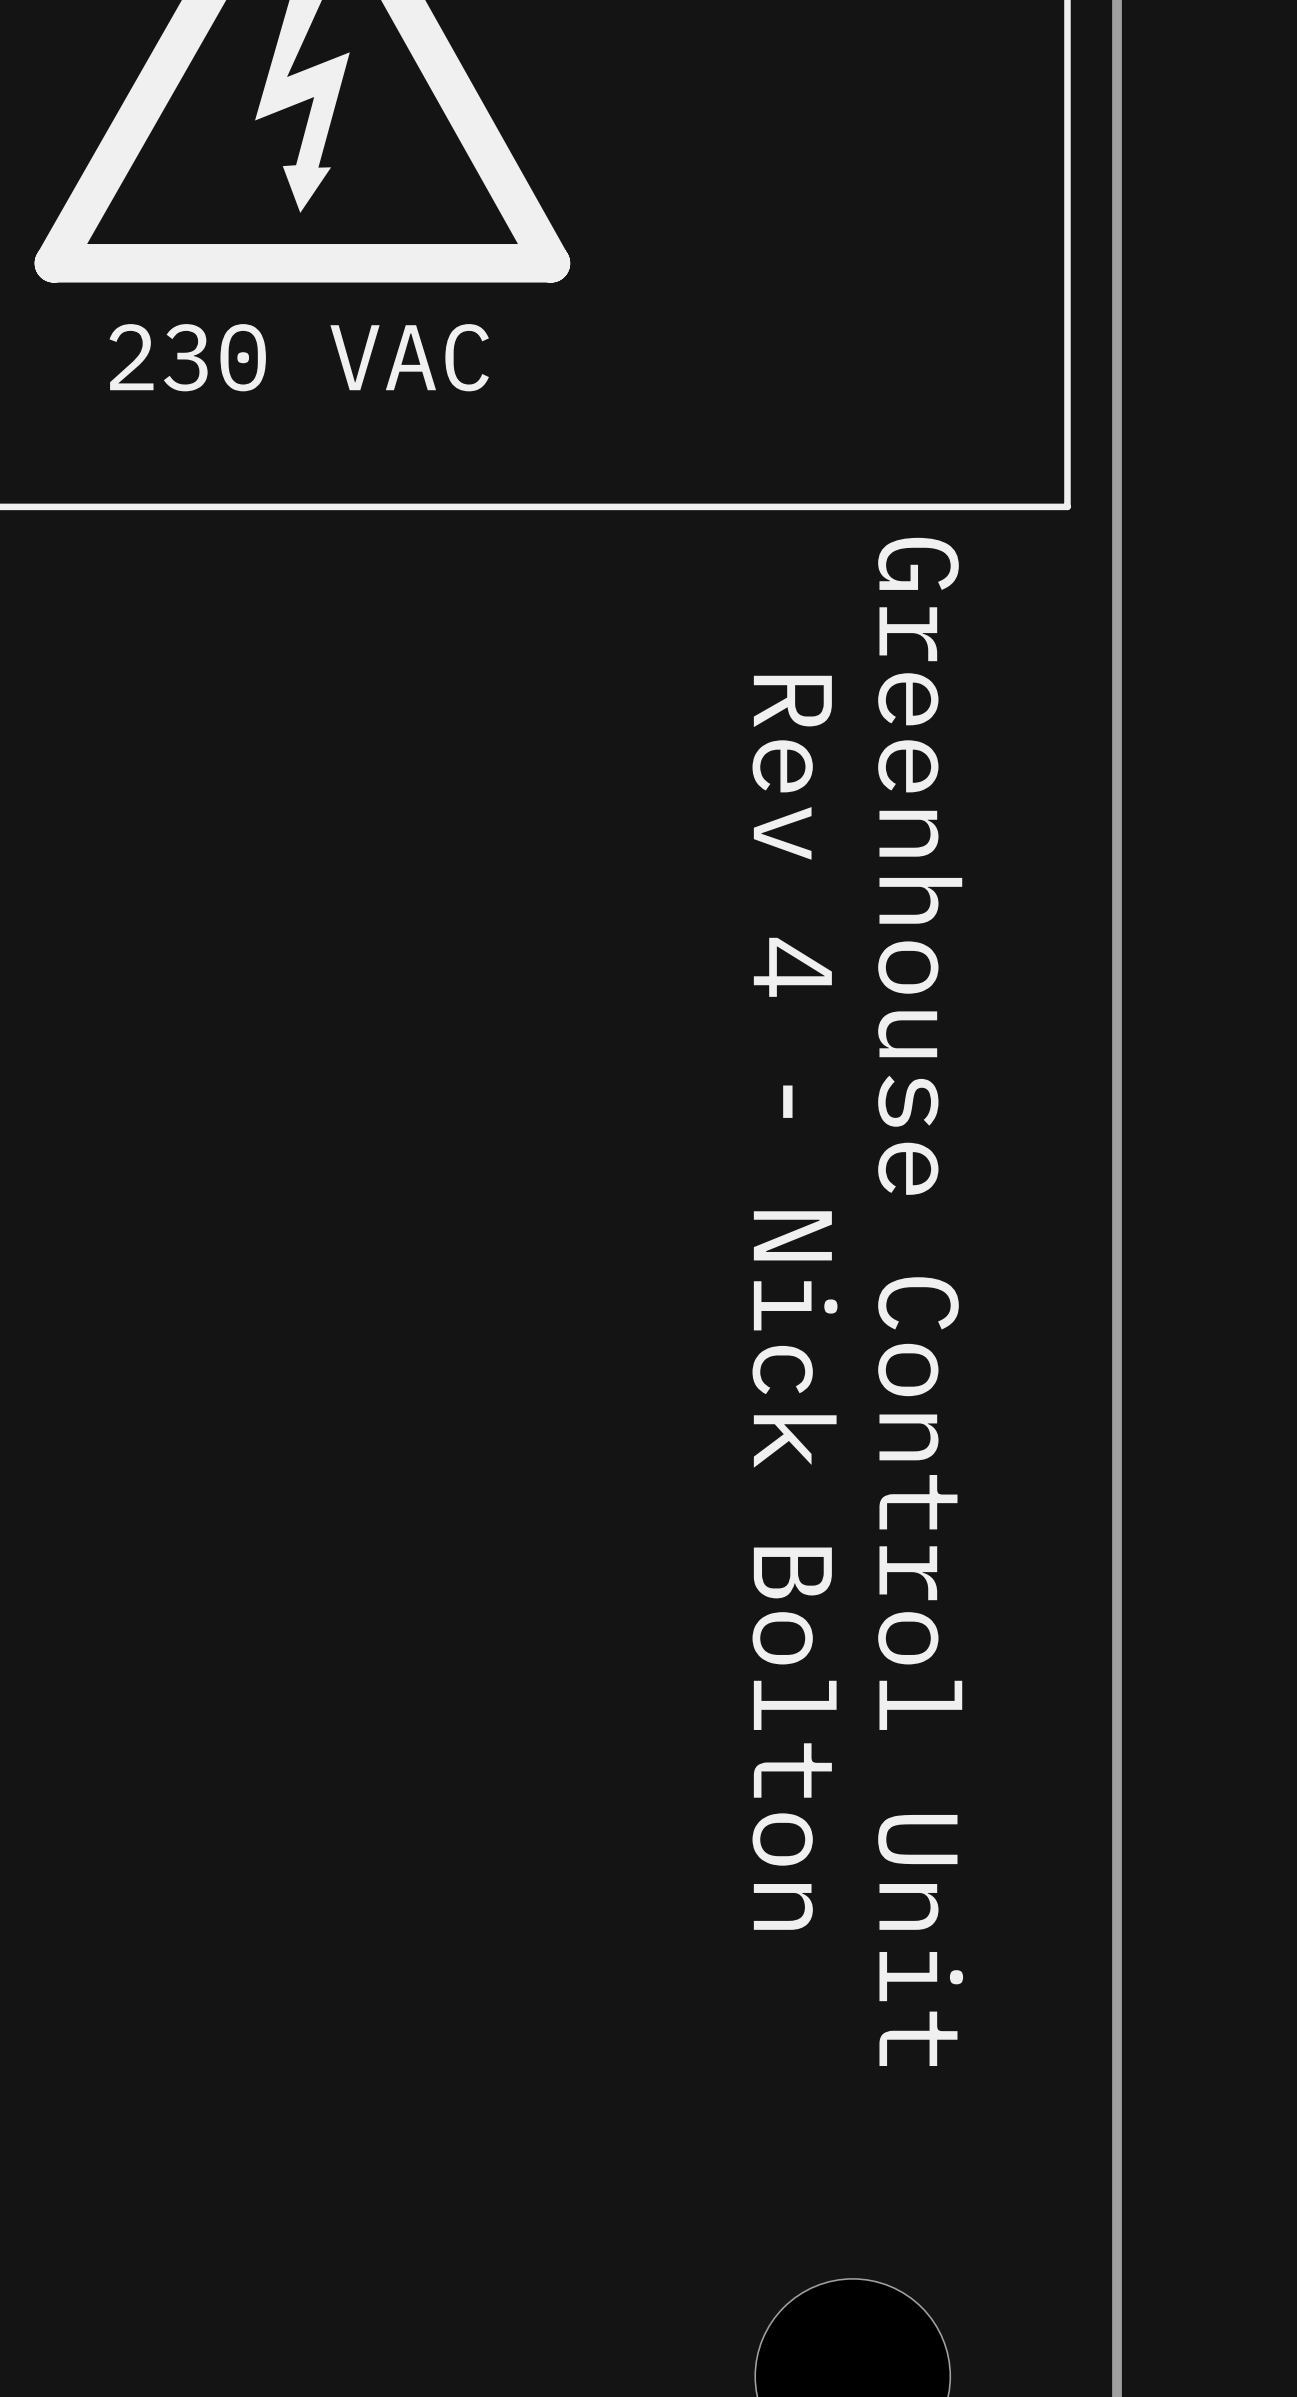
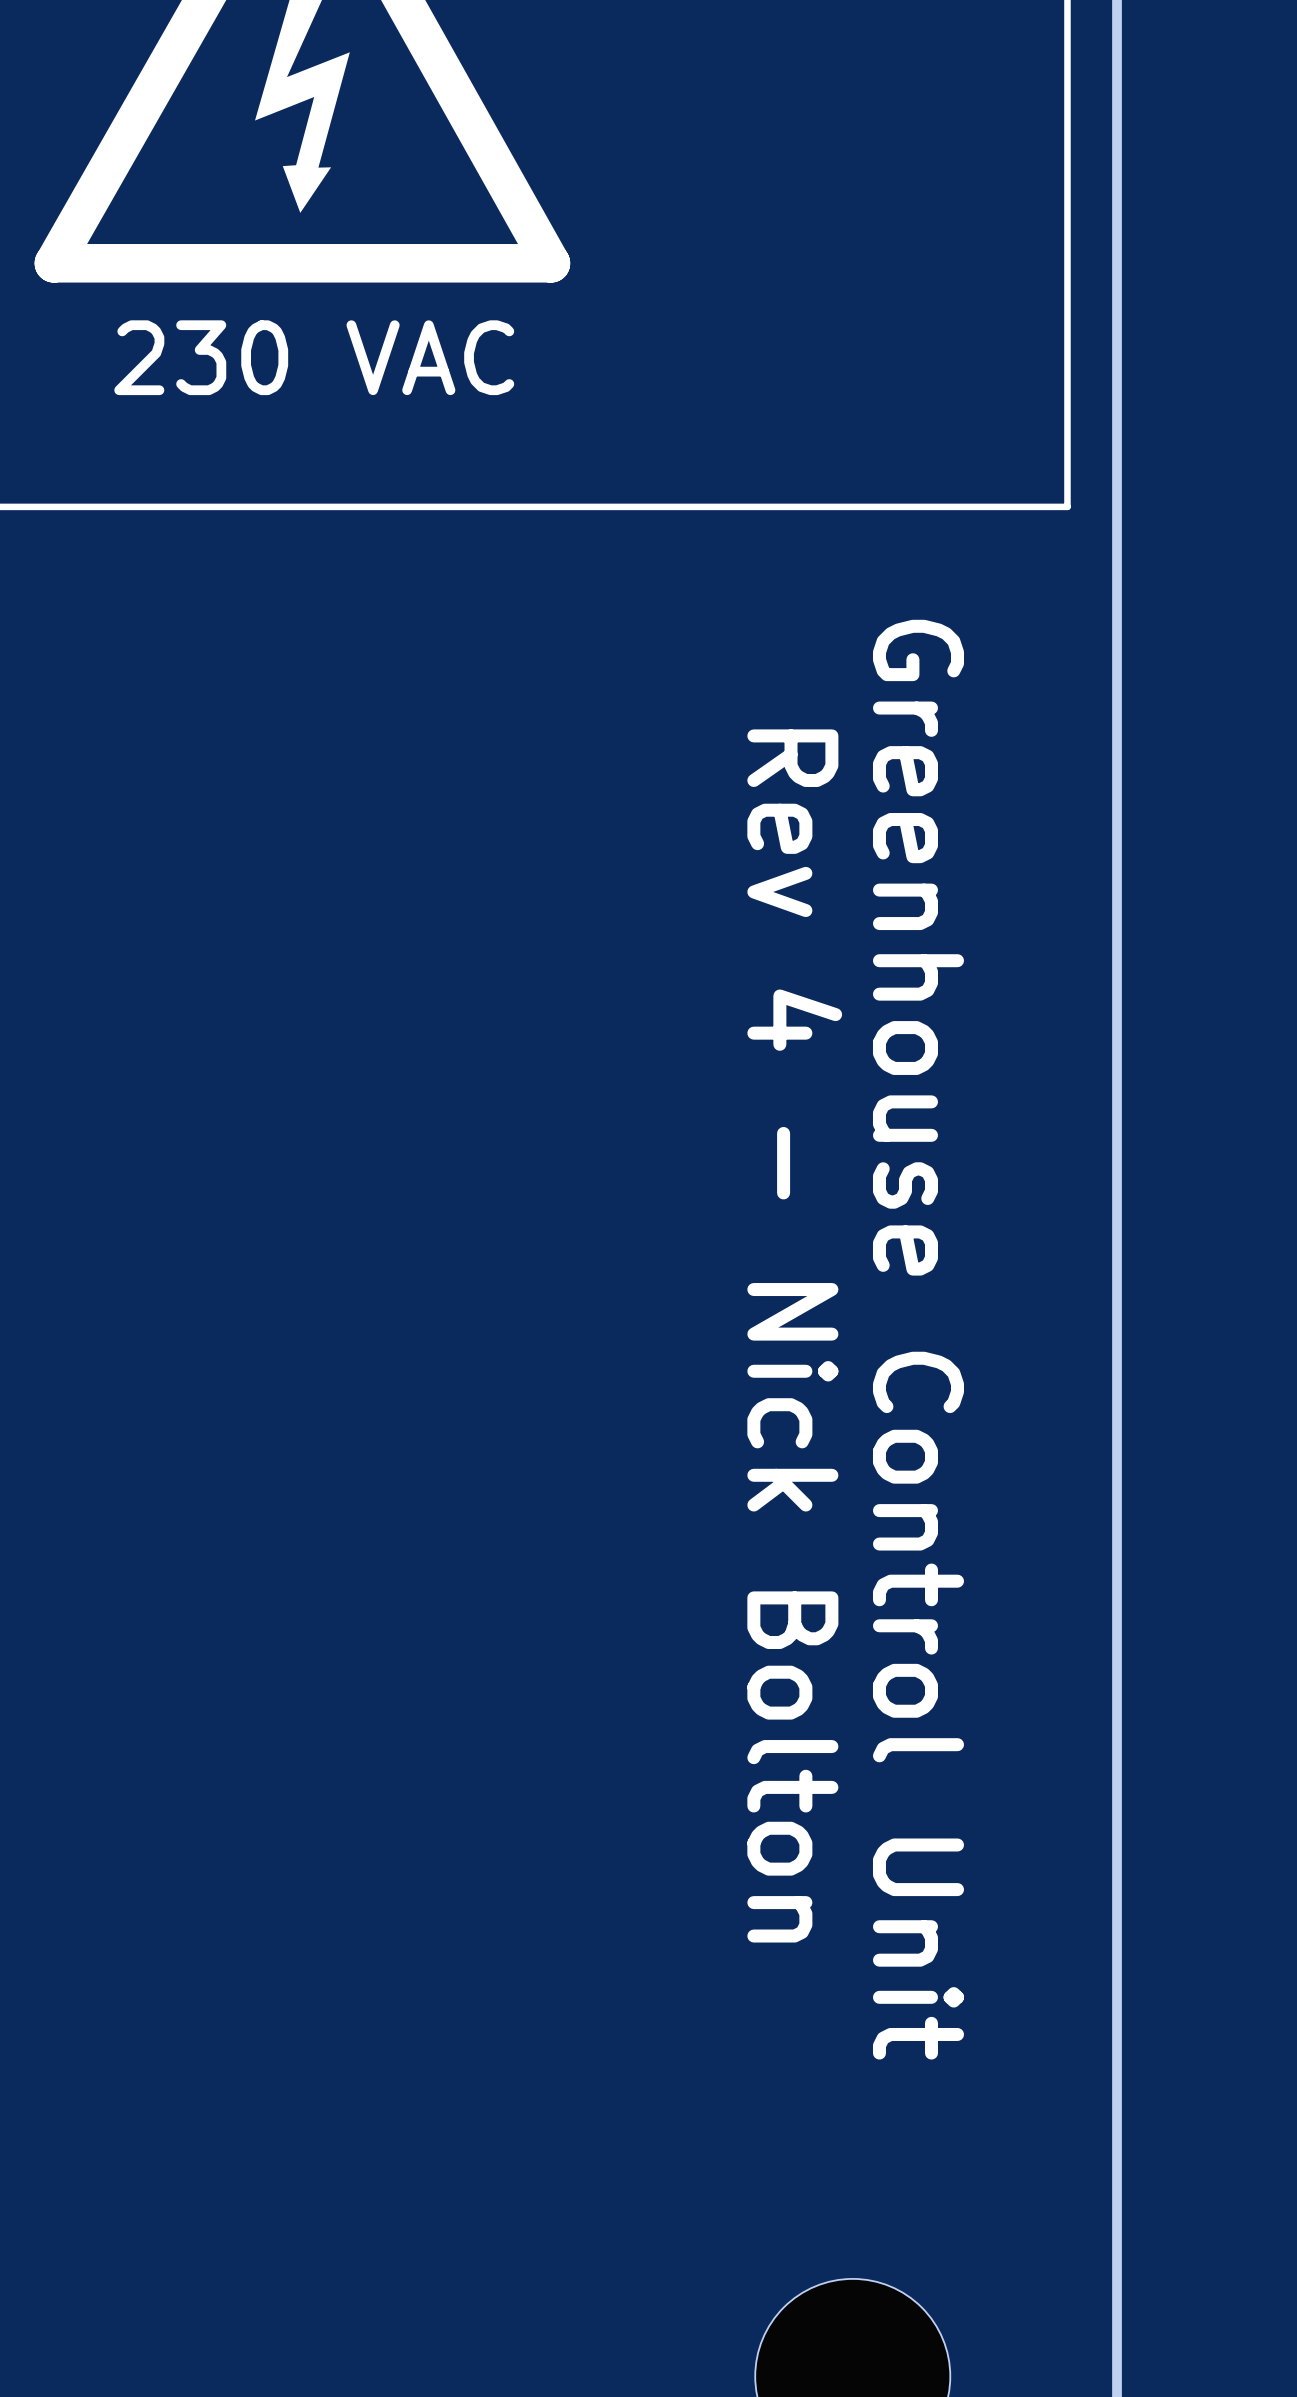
text position: Greenhouse Control Unit (920, 1301) -> Greenhouse Control Unit (918, 1339)
text position: Rev 4 - Nick Bolton (794, 1302) -> Rev 4 - Nick Bolton (794, 1335)

